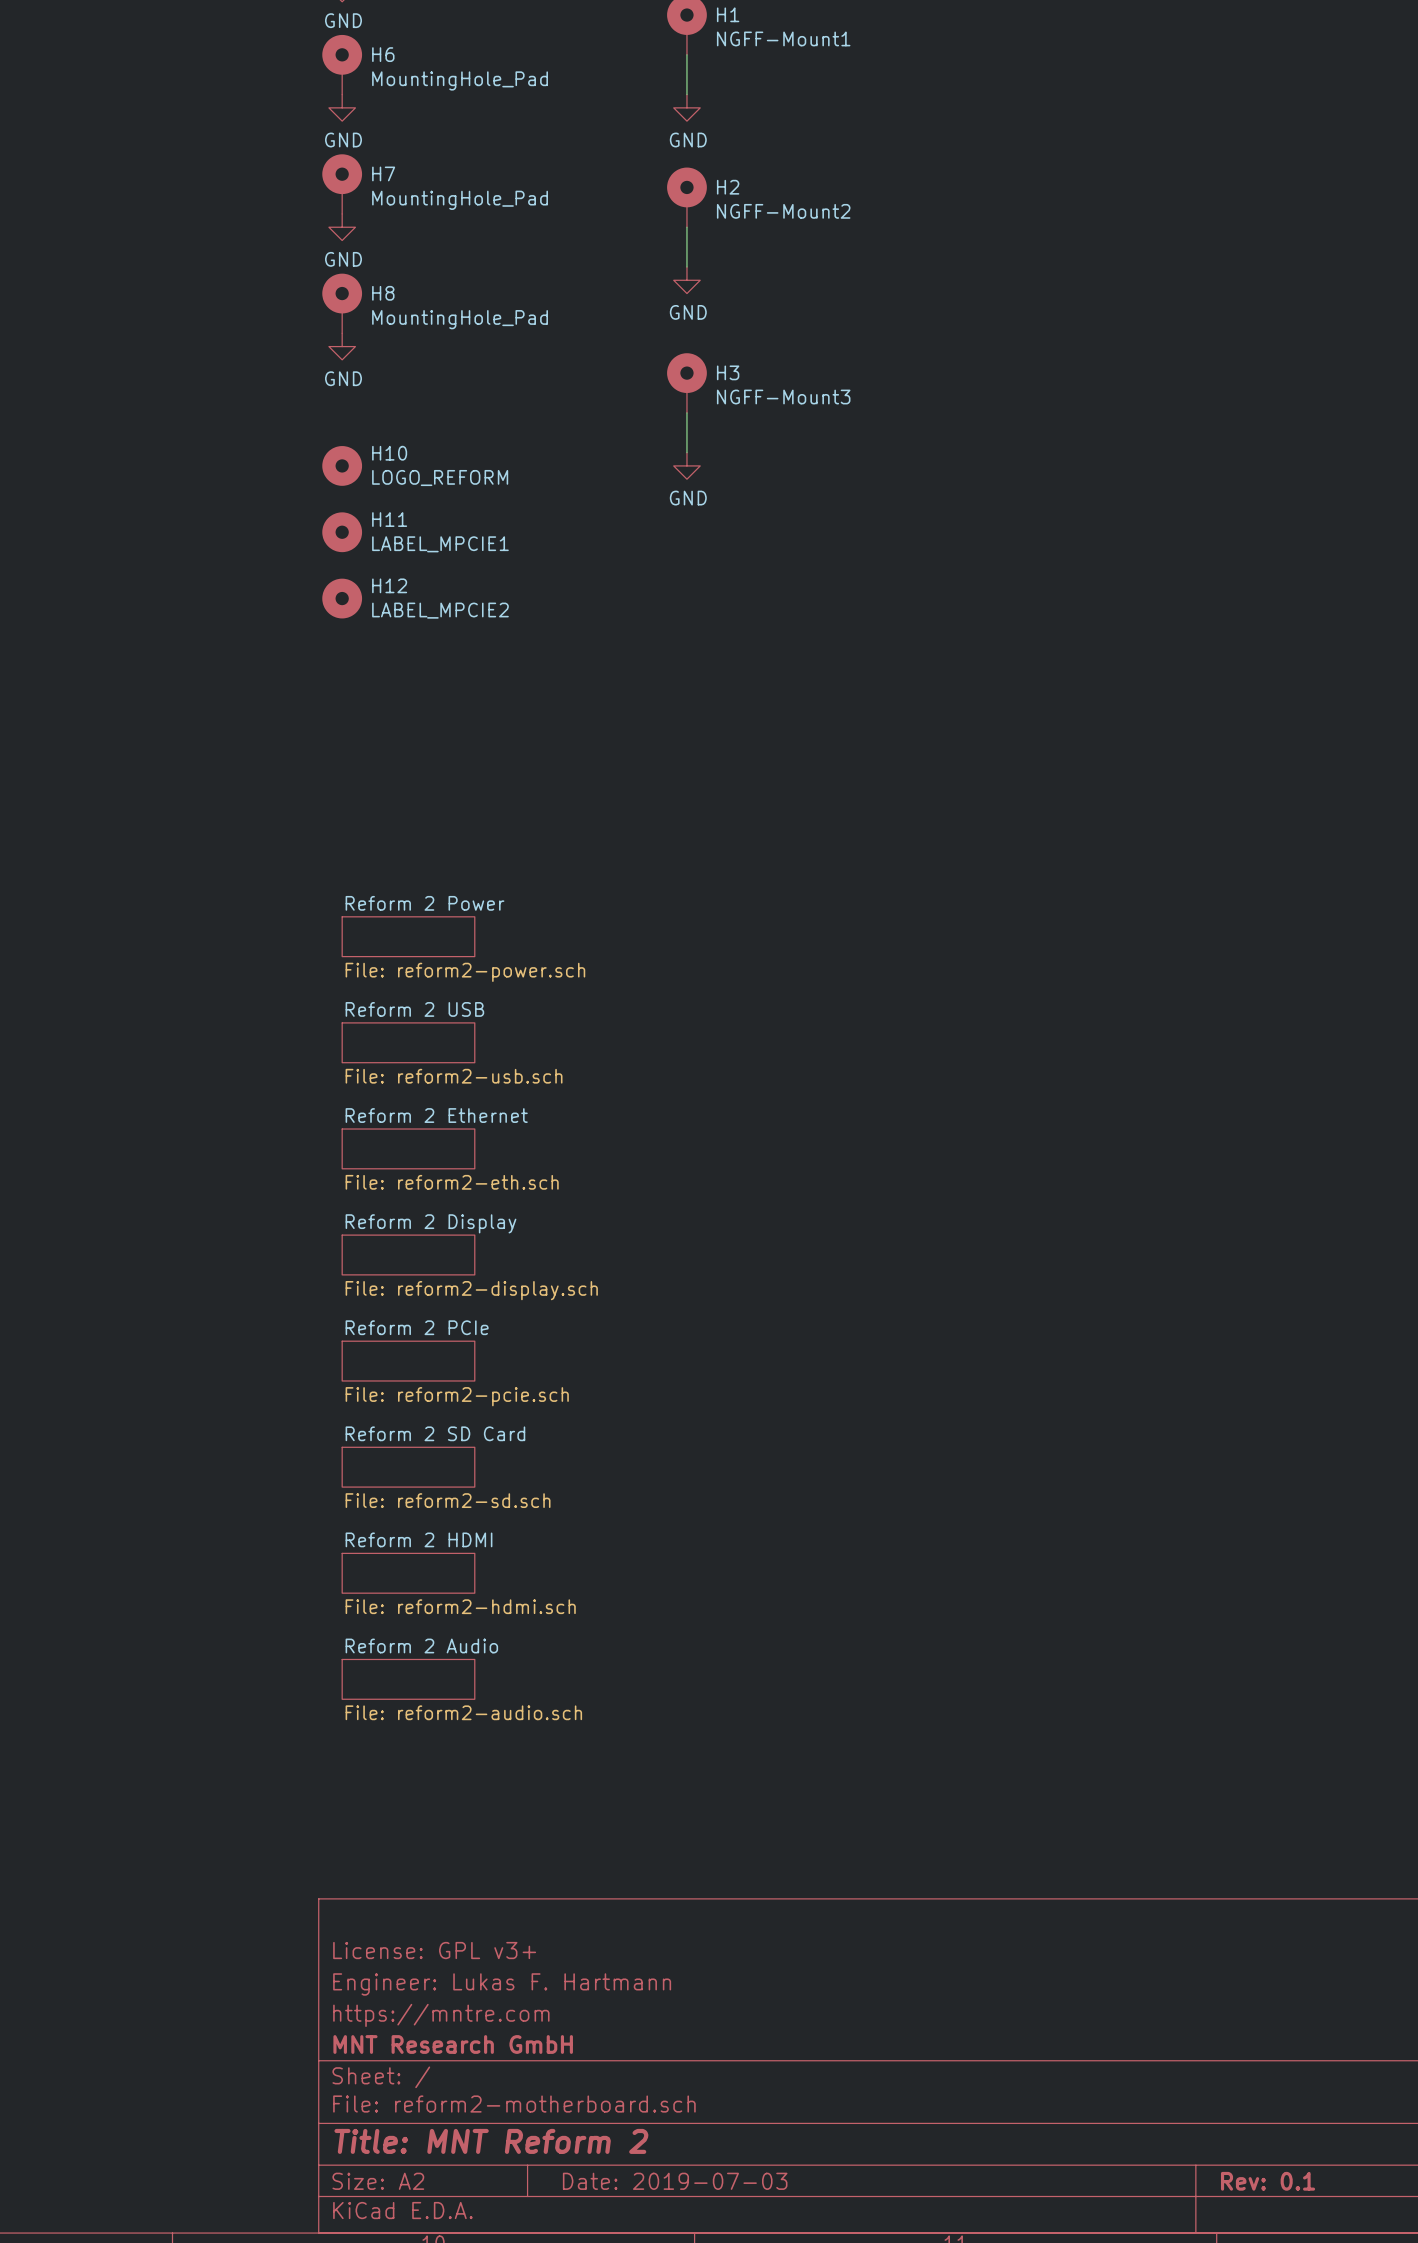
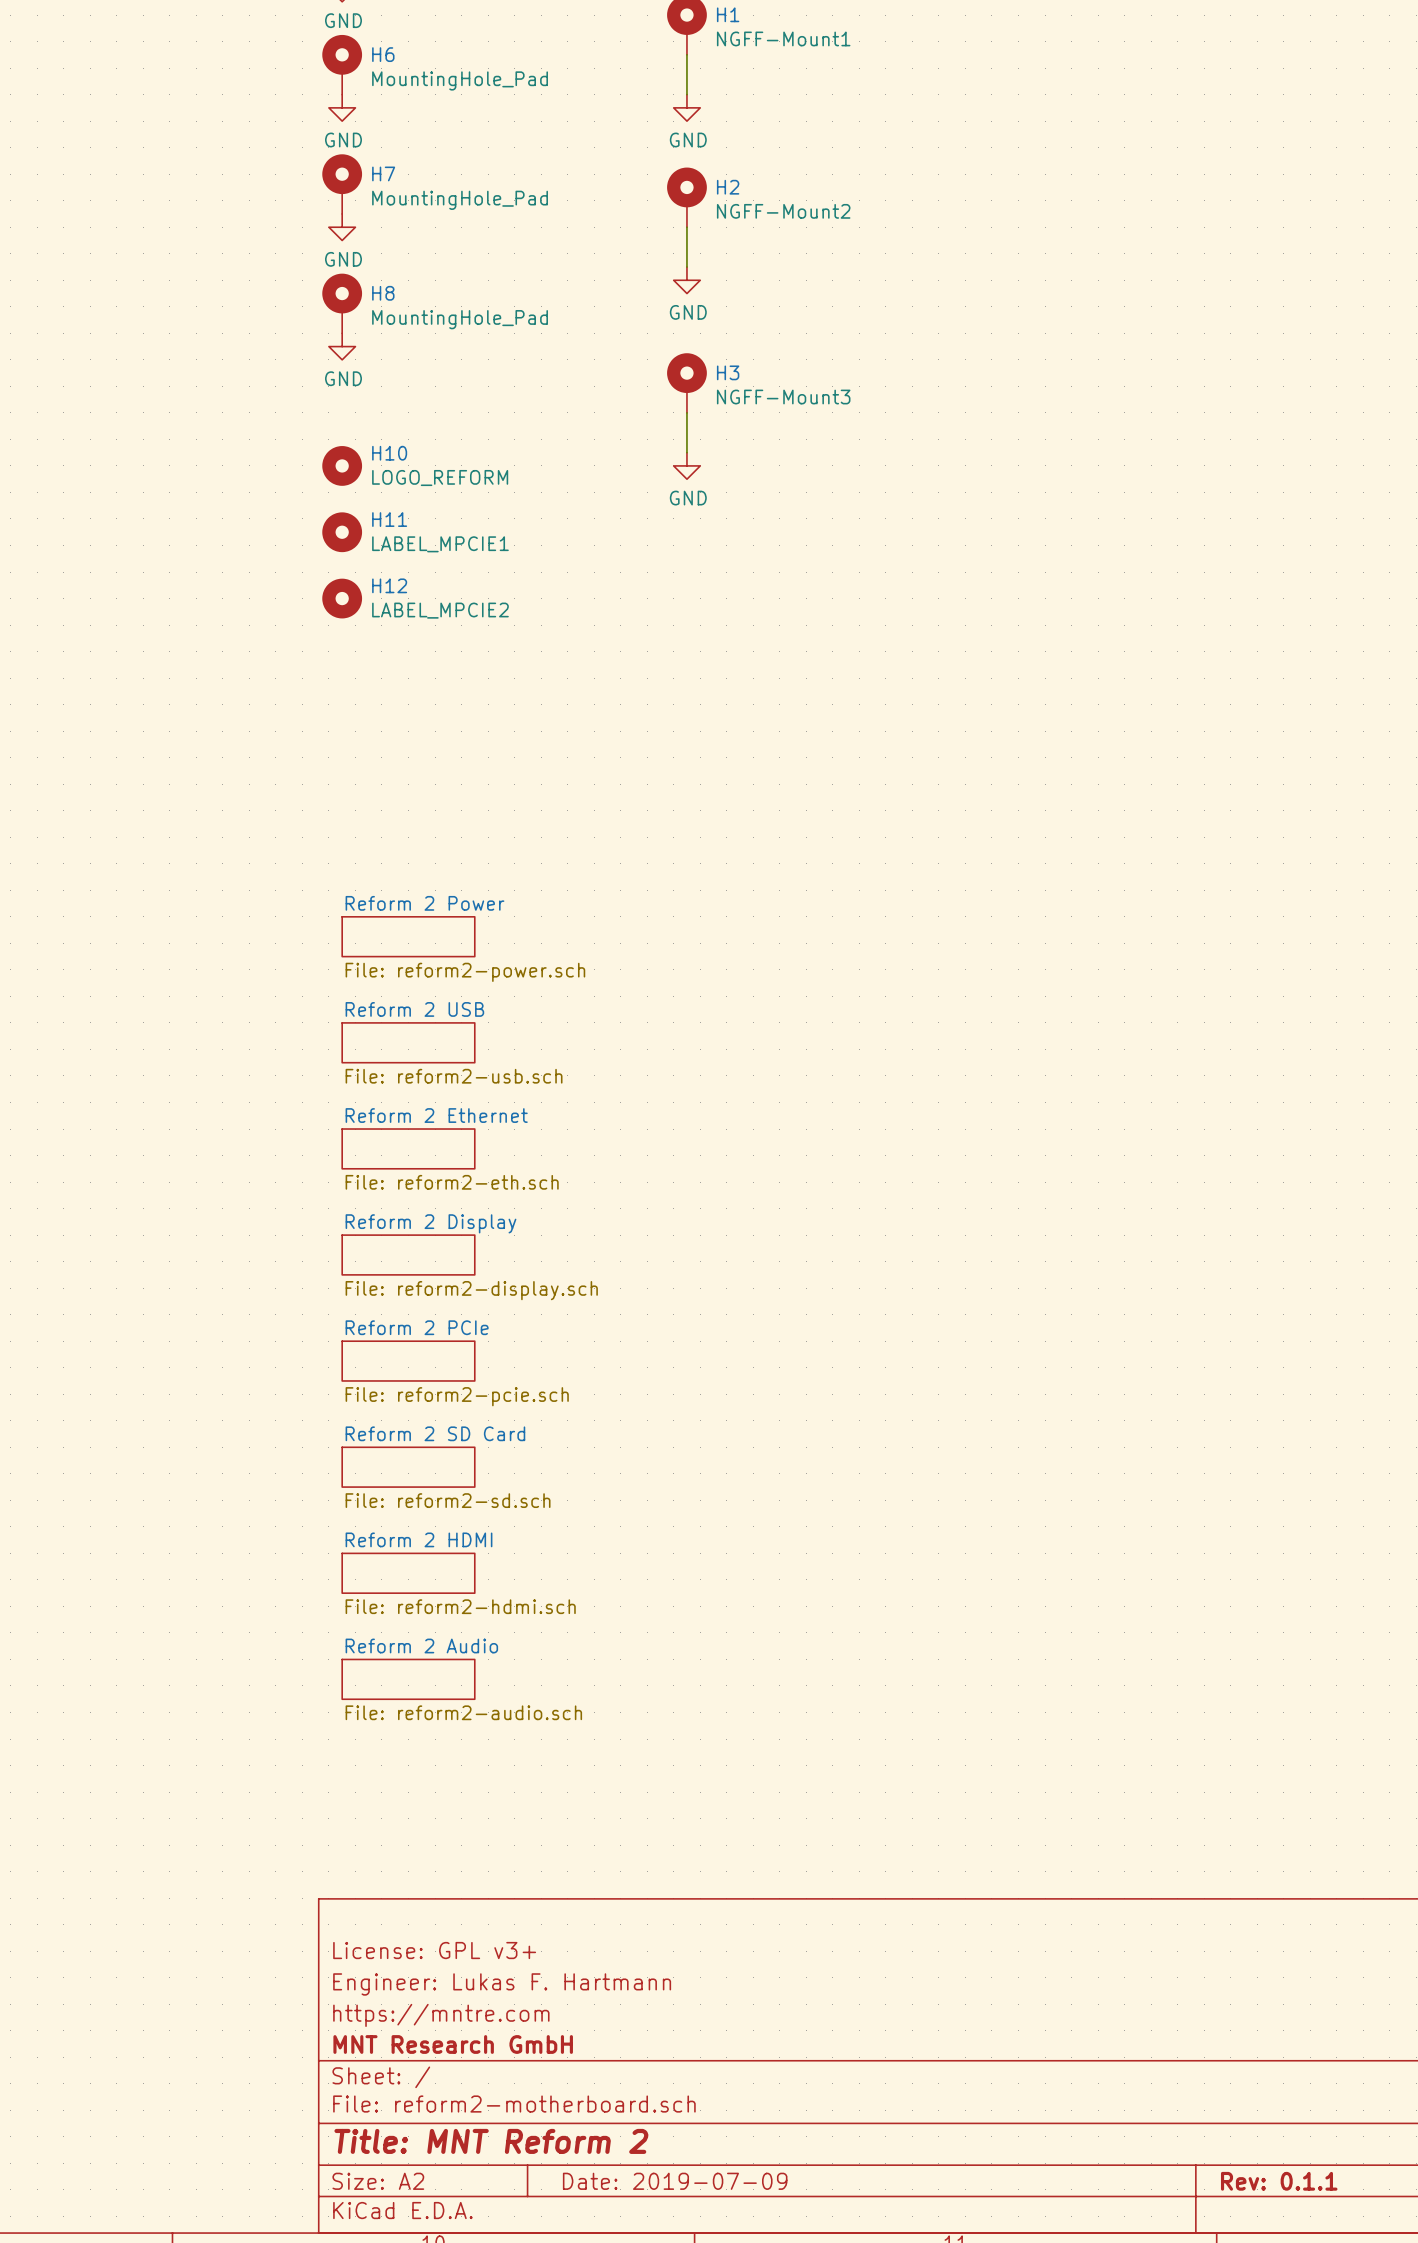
title block: Date: 2019-07-03 (675, 2181) -> Date: 2019-07-09 (675, 2181)
title block: Rev: 0.1 (1268, 2181) -> Rev: 0.1.1 (1279, 2181)

